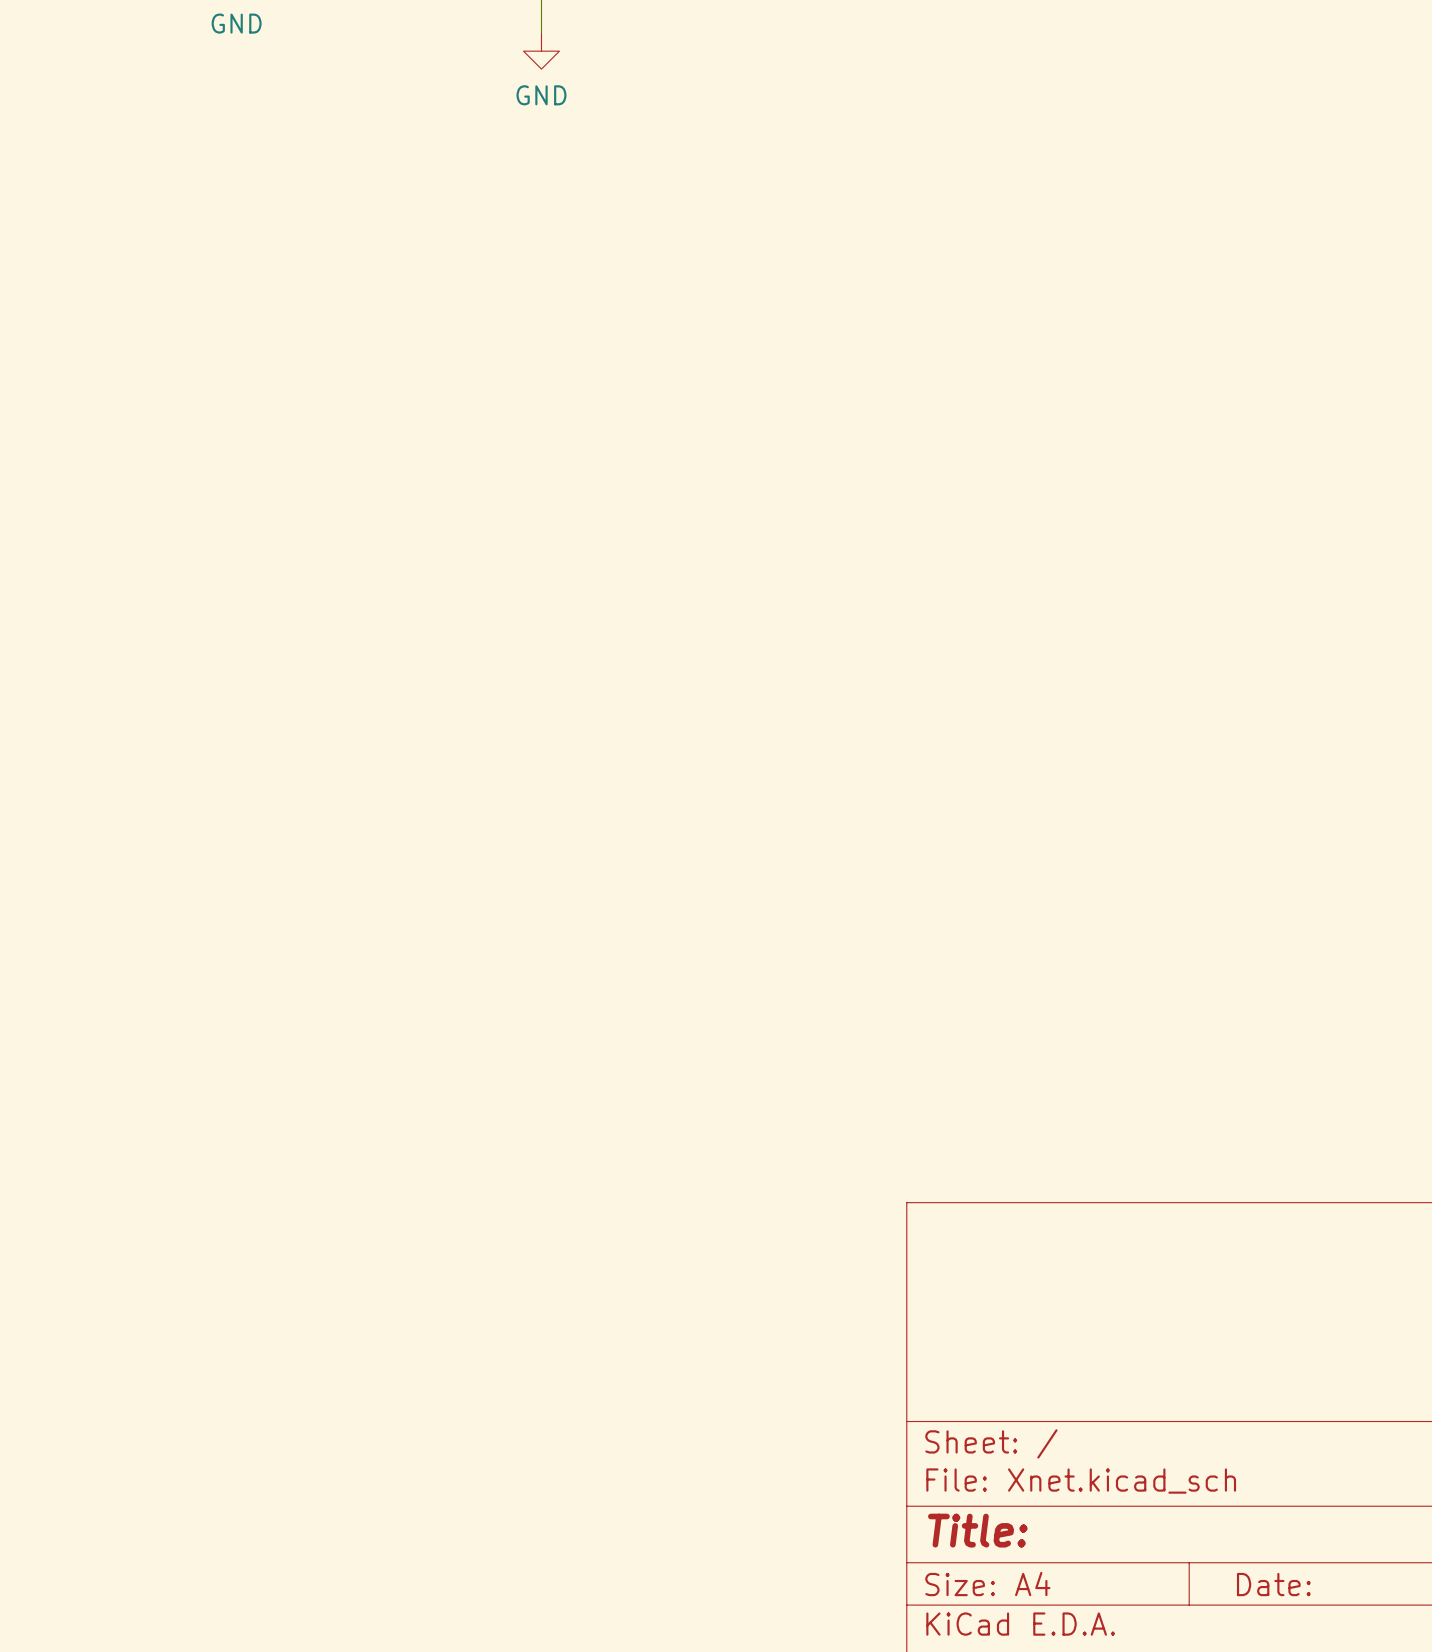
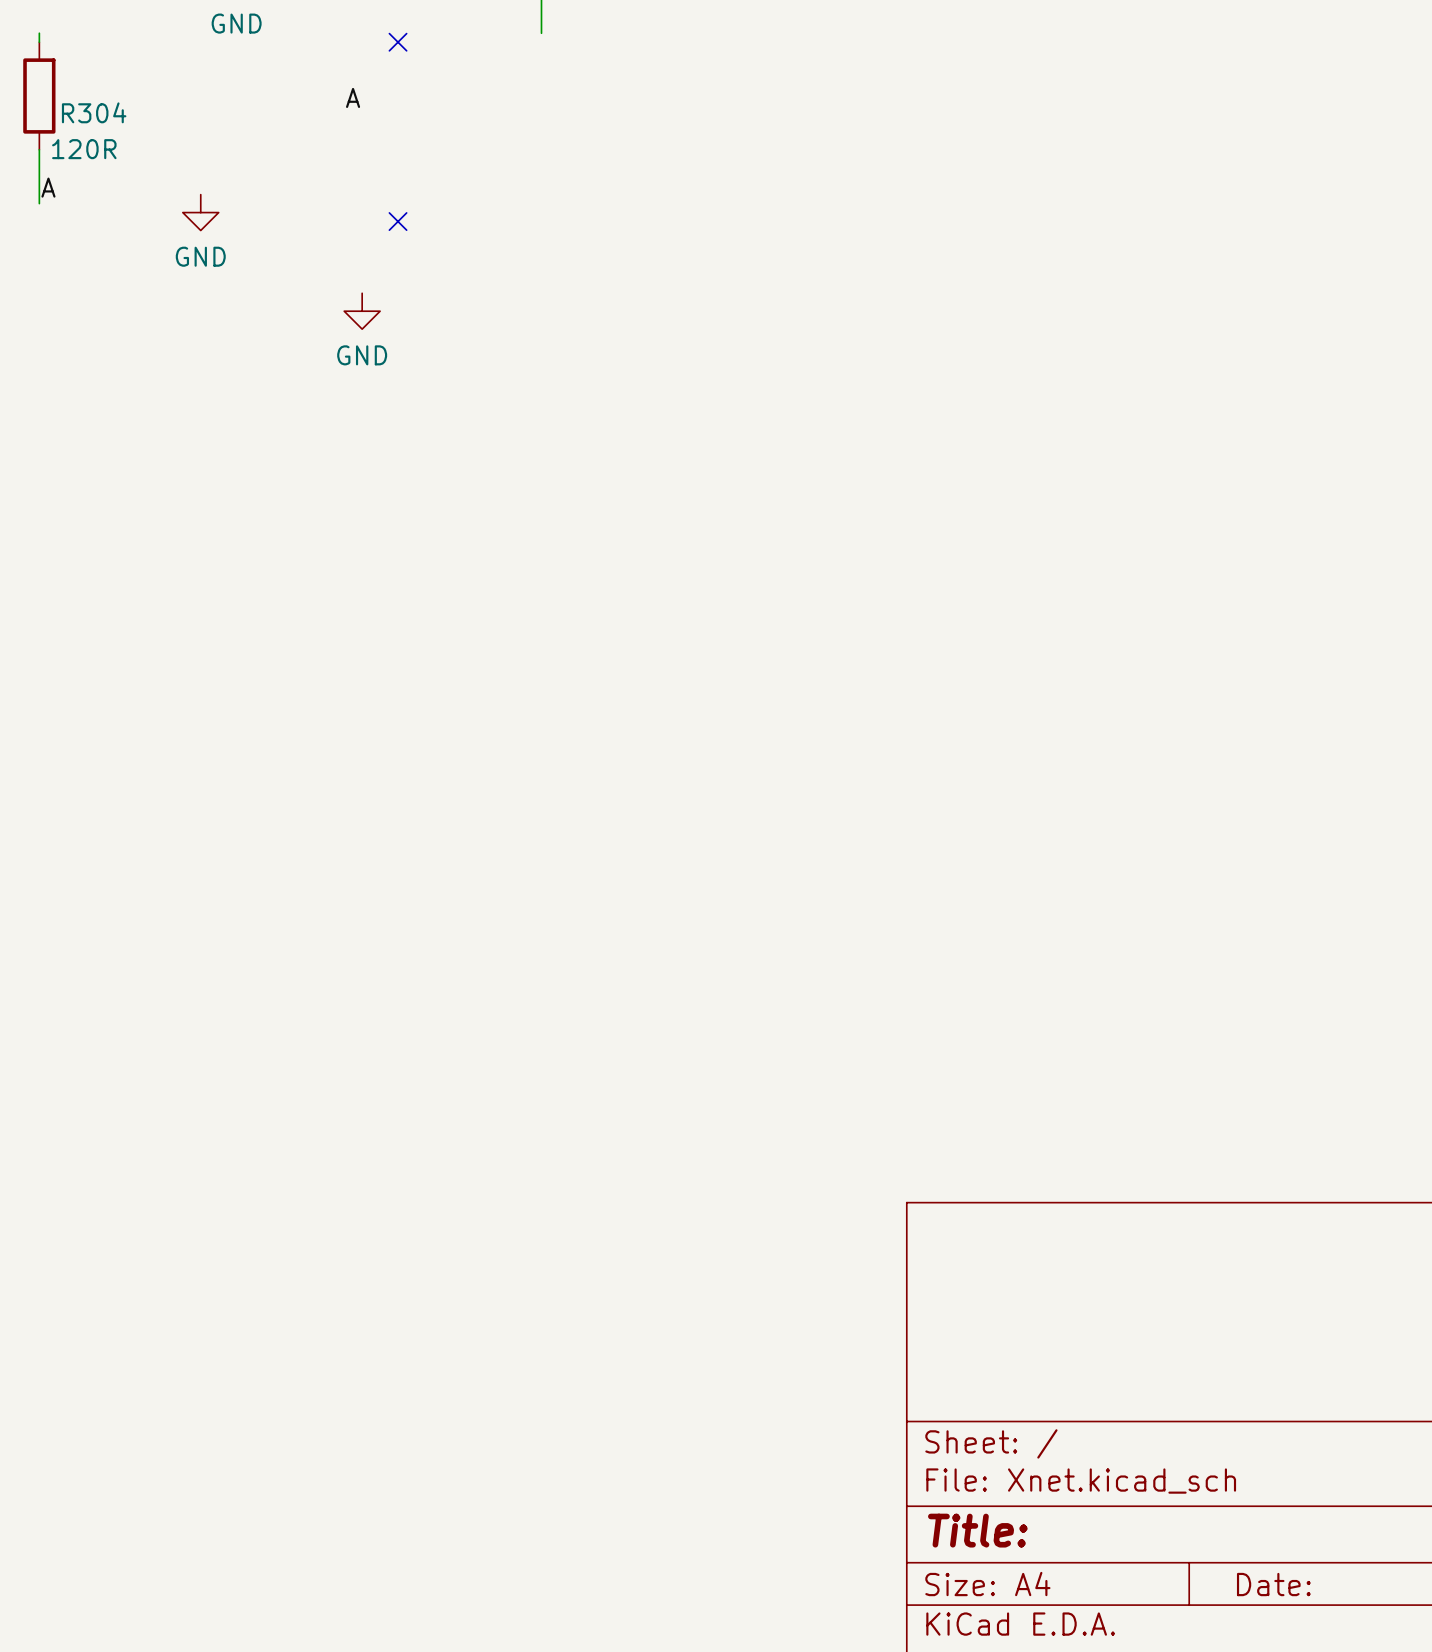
wire: none -> (39, 33) (39, 42)
no-connect mark: none -> (398, 42)
power symbol: GND (541, 51) -> none
R304: none -> 120R (39, 96)
label: none -> A (353, 97)
wire: none -> (39, 149) (39, 203)
label: none -> A (48, 187)
power symbol: none -> GND (200, 212)
no-connect mark: none -> (398, 221)
power symbol: none -> GND (362, 311)

